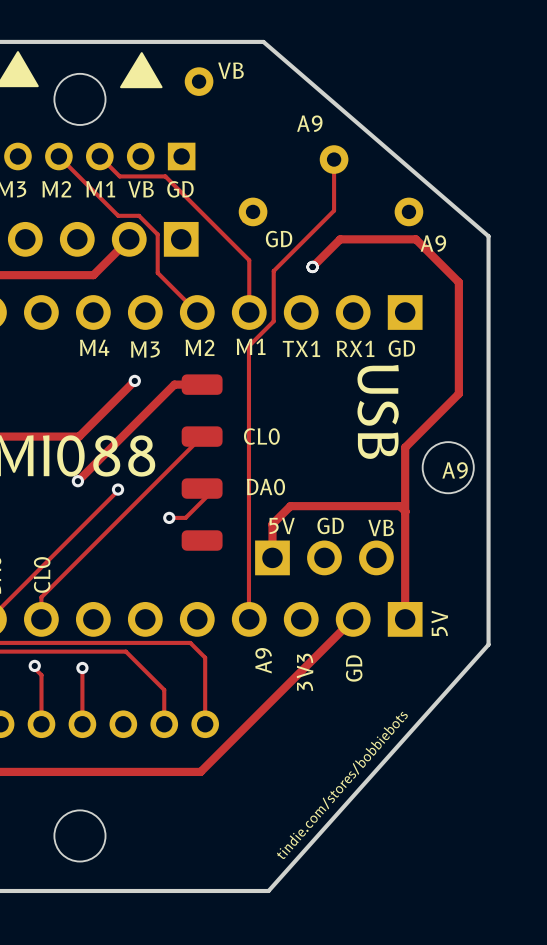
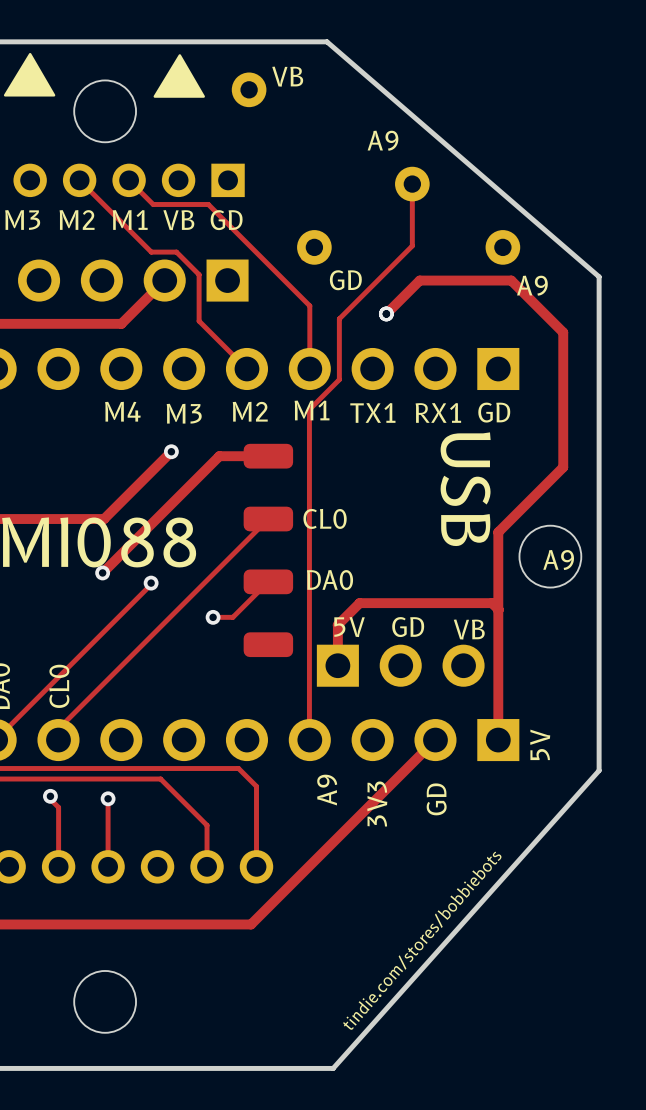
part position: (202, 384) -> (268, 456)
track: (202, 436) (41, 597) (41, 610) -> (268, 519) (58, 728)
part position: (202, 436) -> (268, 519)
part position: (202, 488) -> (268, 581)
part position: (202, 540) -> (268, 644)

